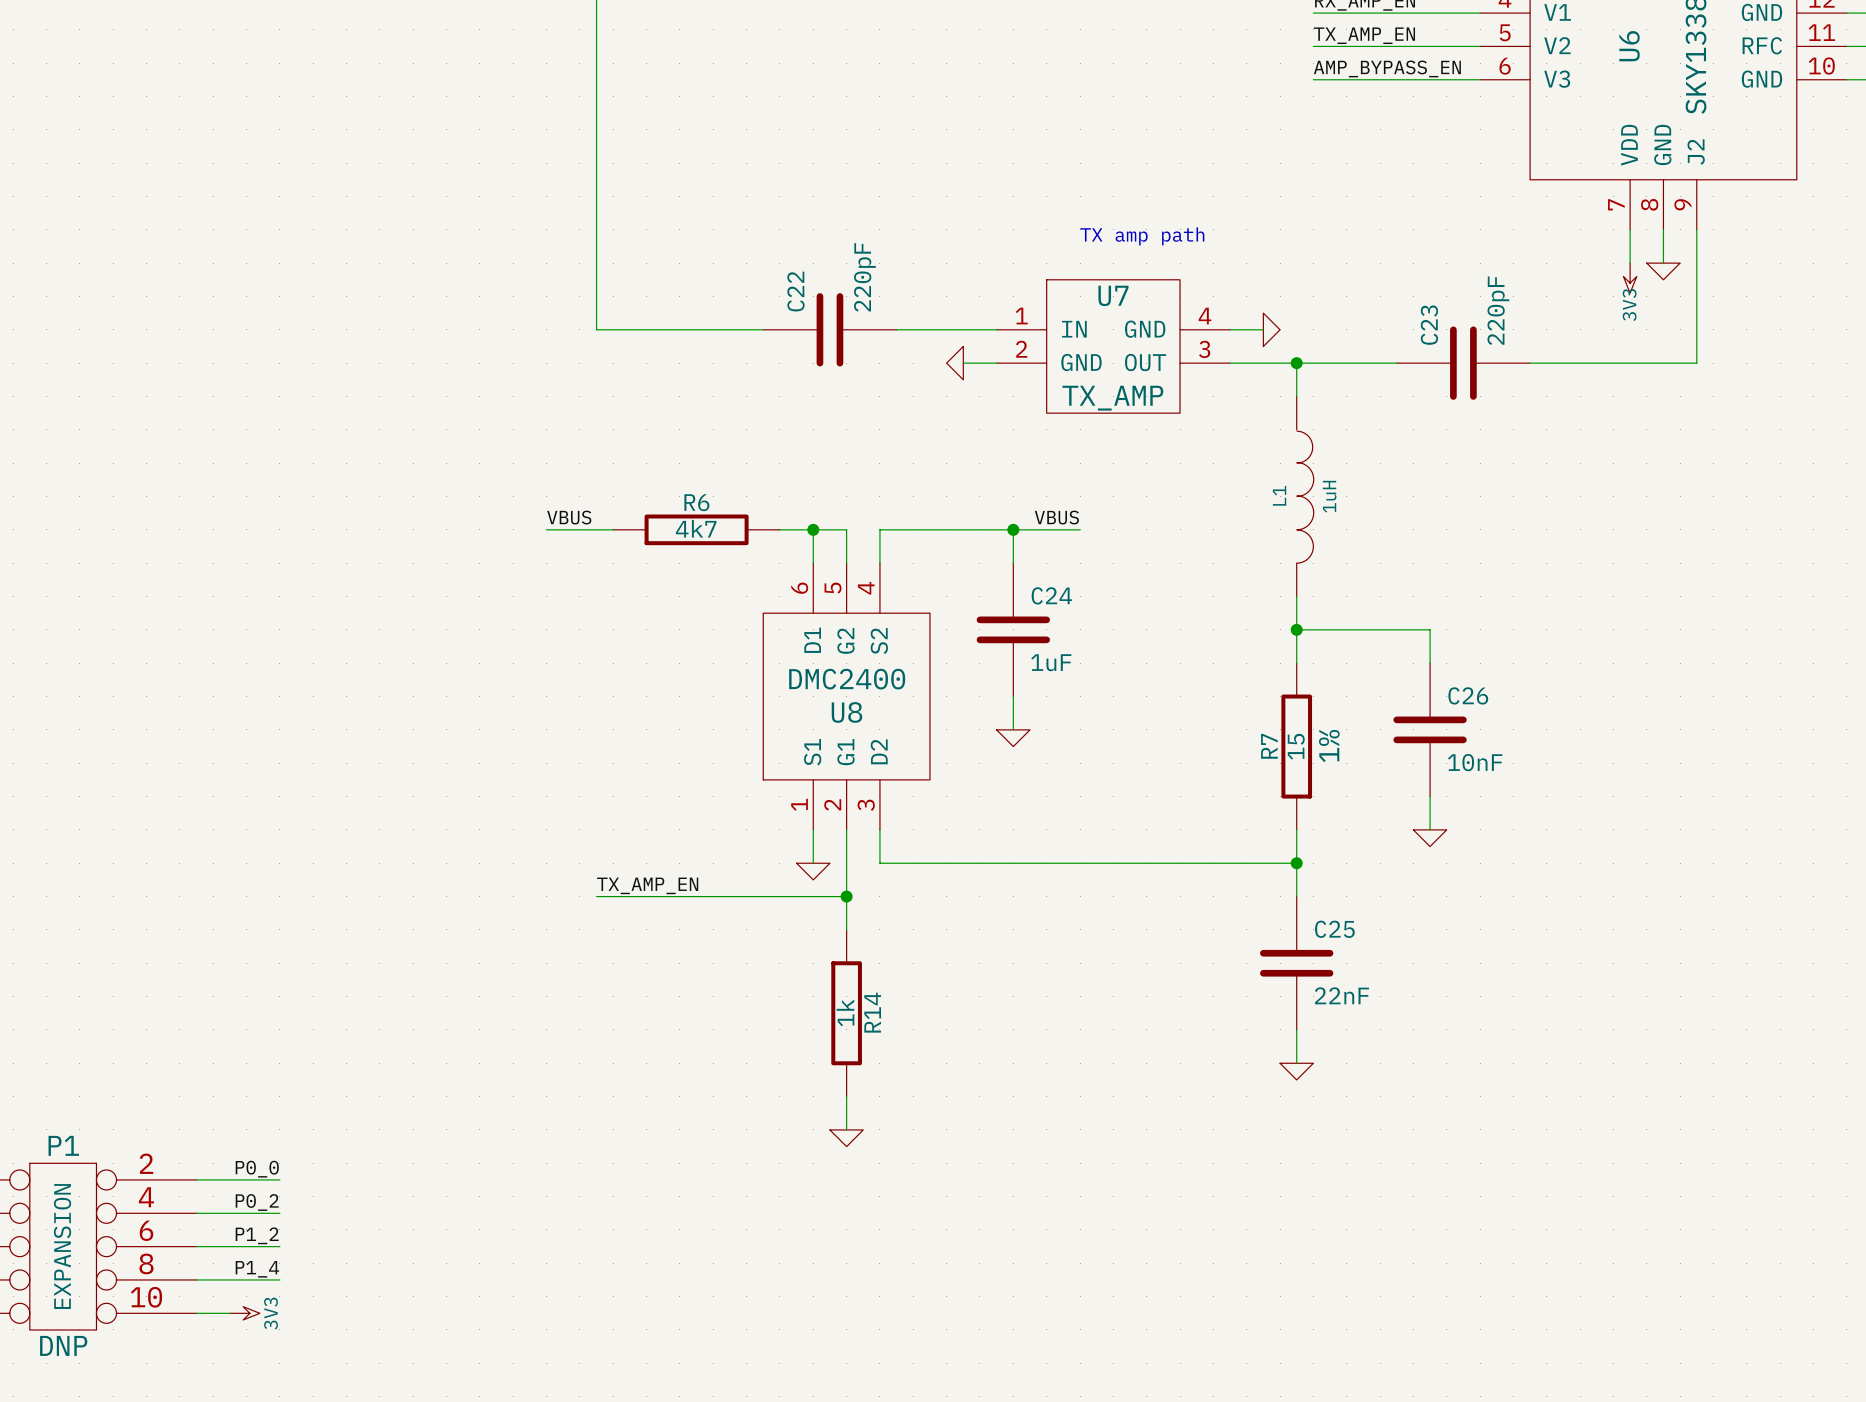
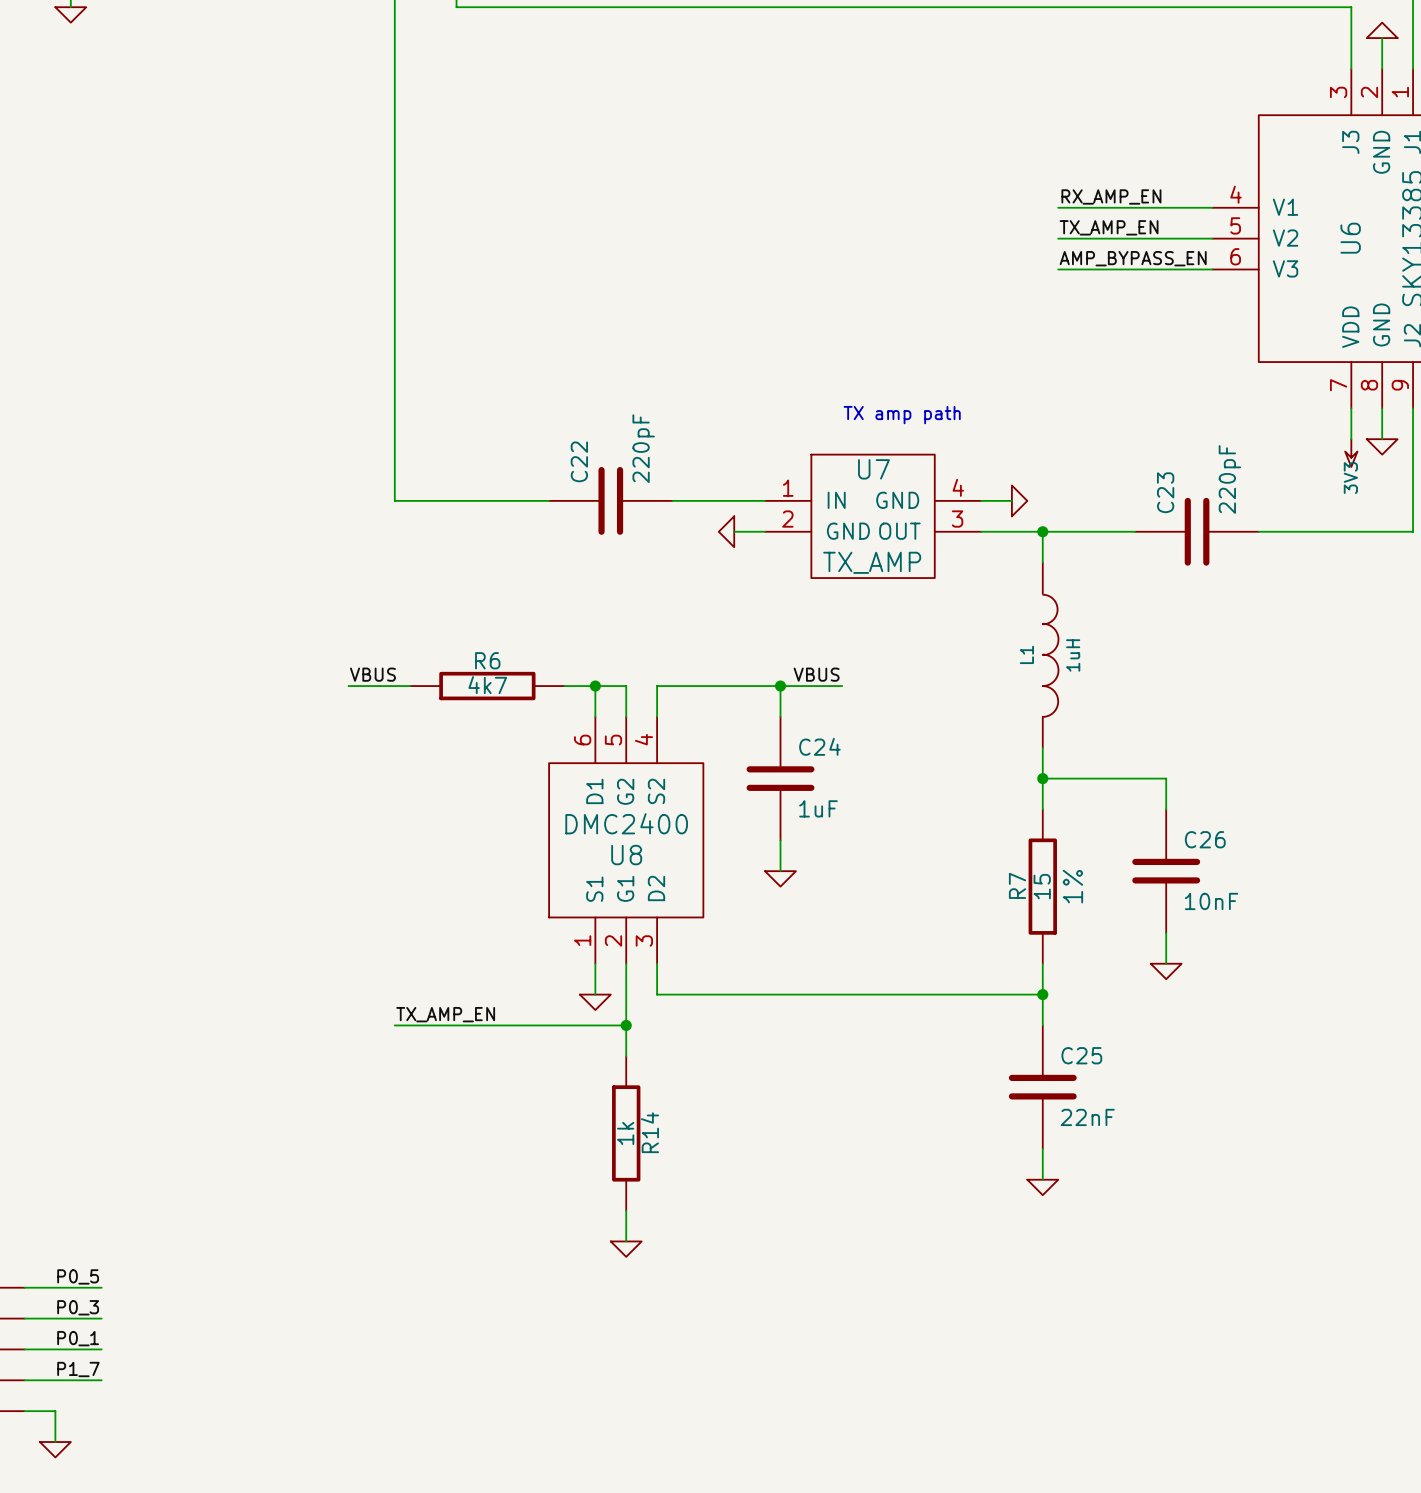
label: P0_0 (257, 1169) -> P0_5 (78, 1276)
label: P0_2 (257, 1202) -> P0_3 (78, 1307)
label: P1_2 (257, 1235) -> P0_1 (78, 1338)
label: P1_4 (257, 1269) -> P1_7 (78, 1369)
wire: none -> (55, 1411) (55, 1442)
power symbol: 3V3 (244, 1313) -> none
power symbol: none -> (55, 1449)

